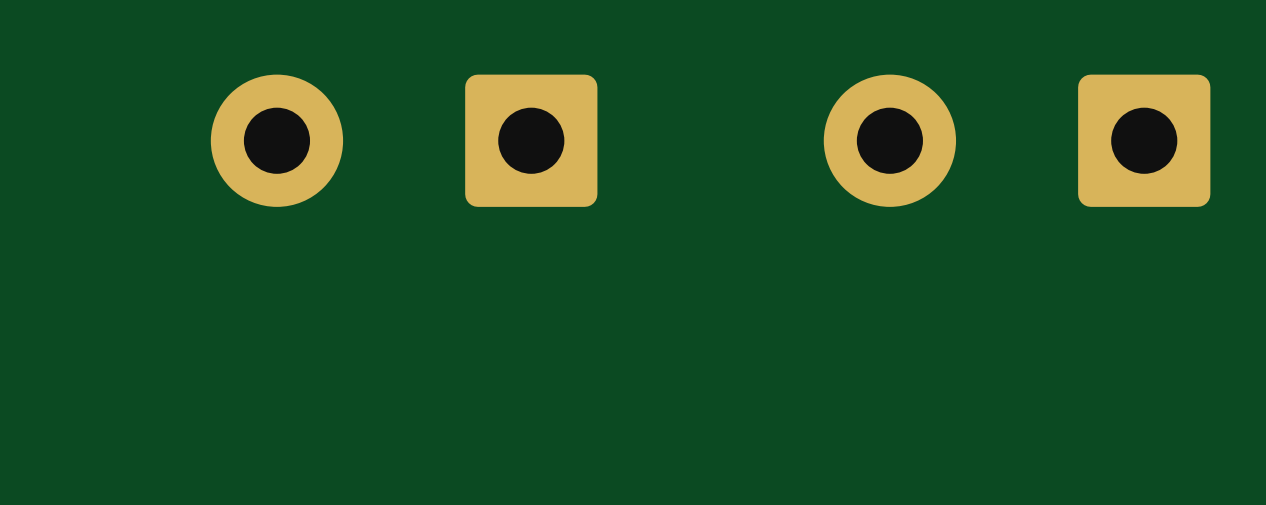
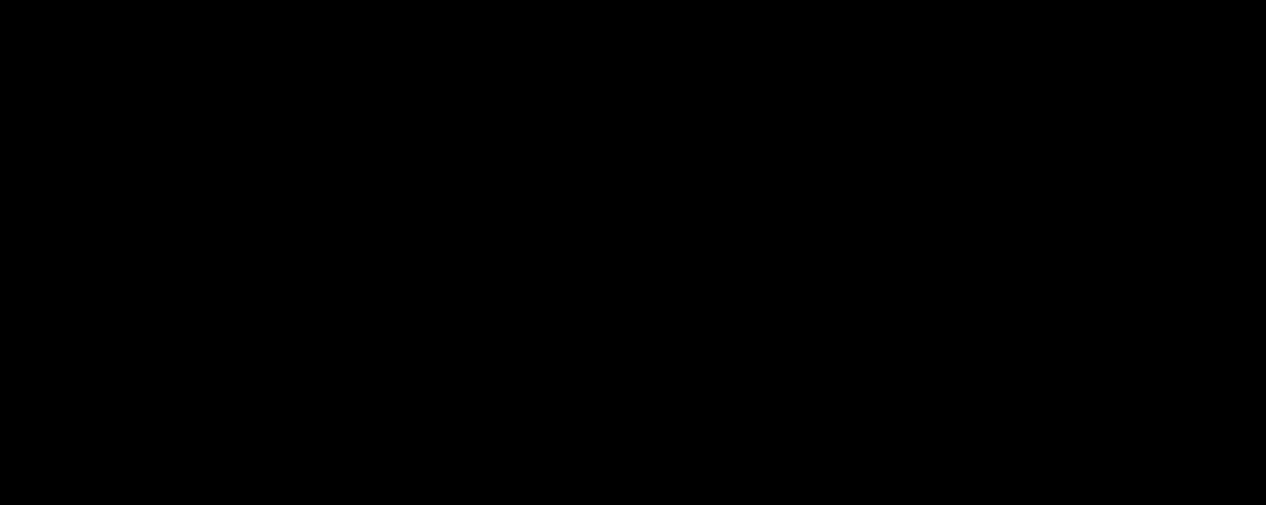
part: (404, 140) -> none
part: (1017, 140) -> none

